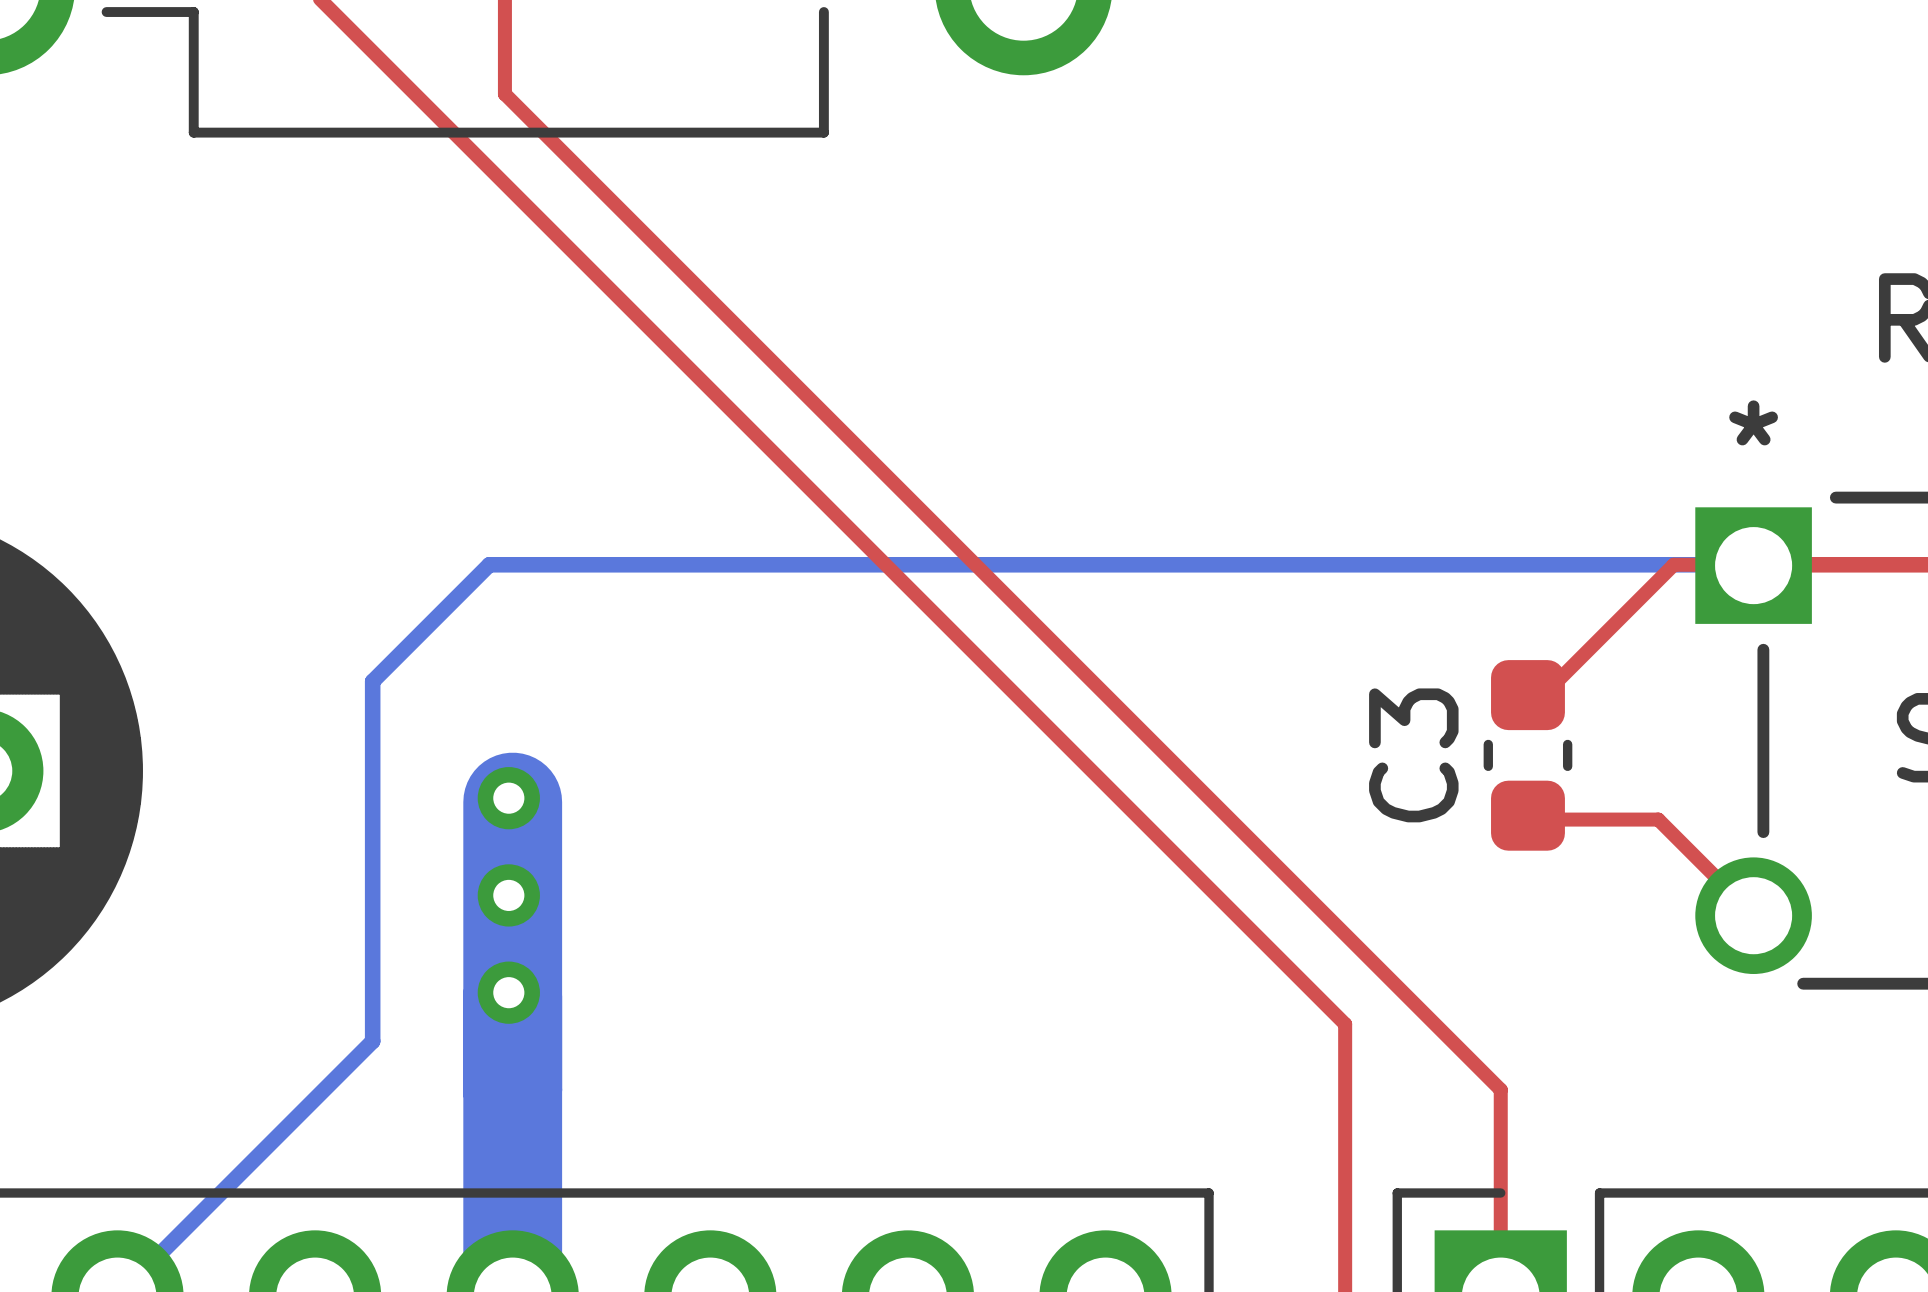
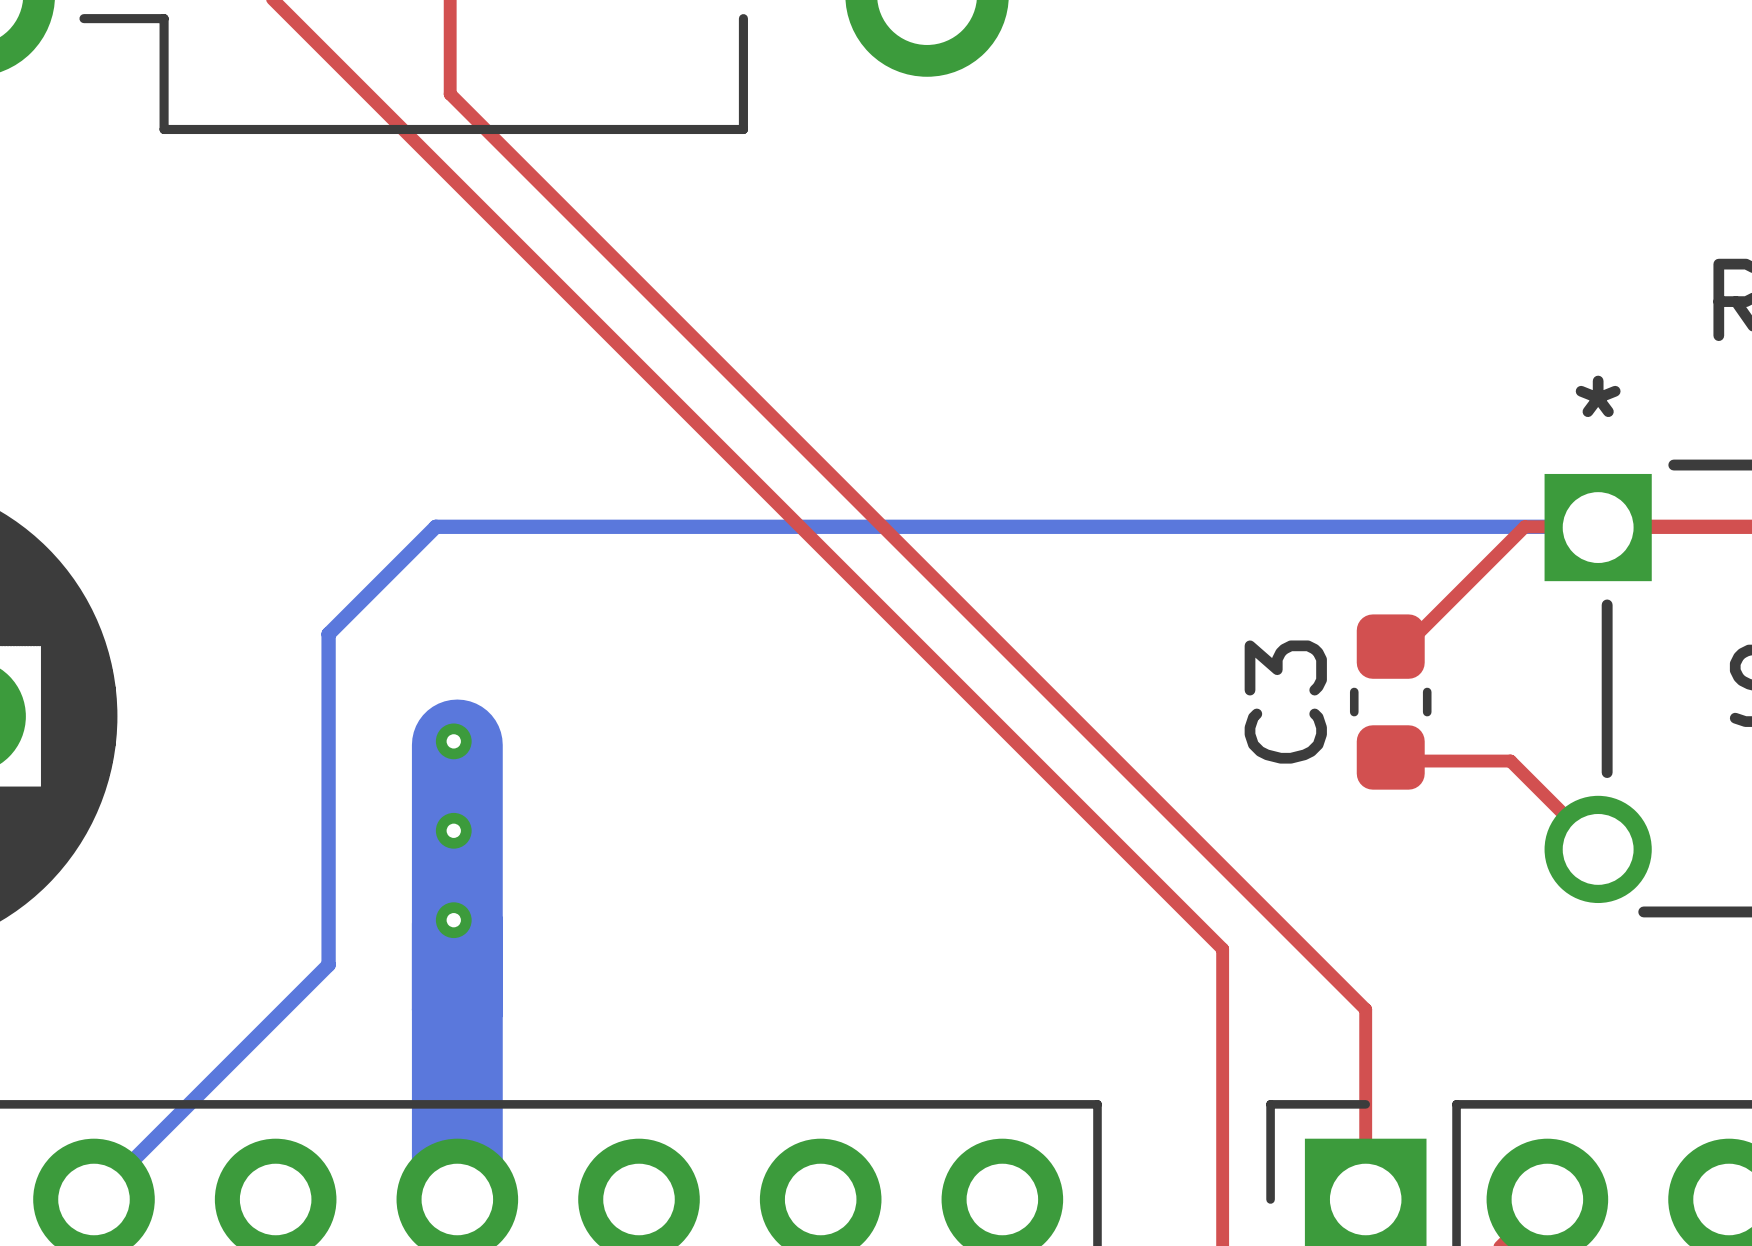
via size: [477, 767, 540, 830] -> [435, 723, 472, 760]
via size: [477, 864, 540, 927] -> [435, 812, 472, 849]
via size: [477, 961, 540, 1024] -> [435, 902, 472, 939]

